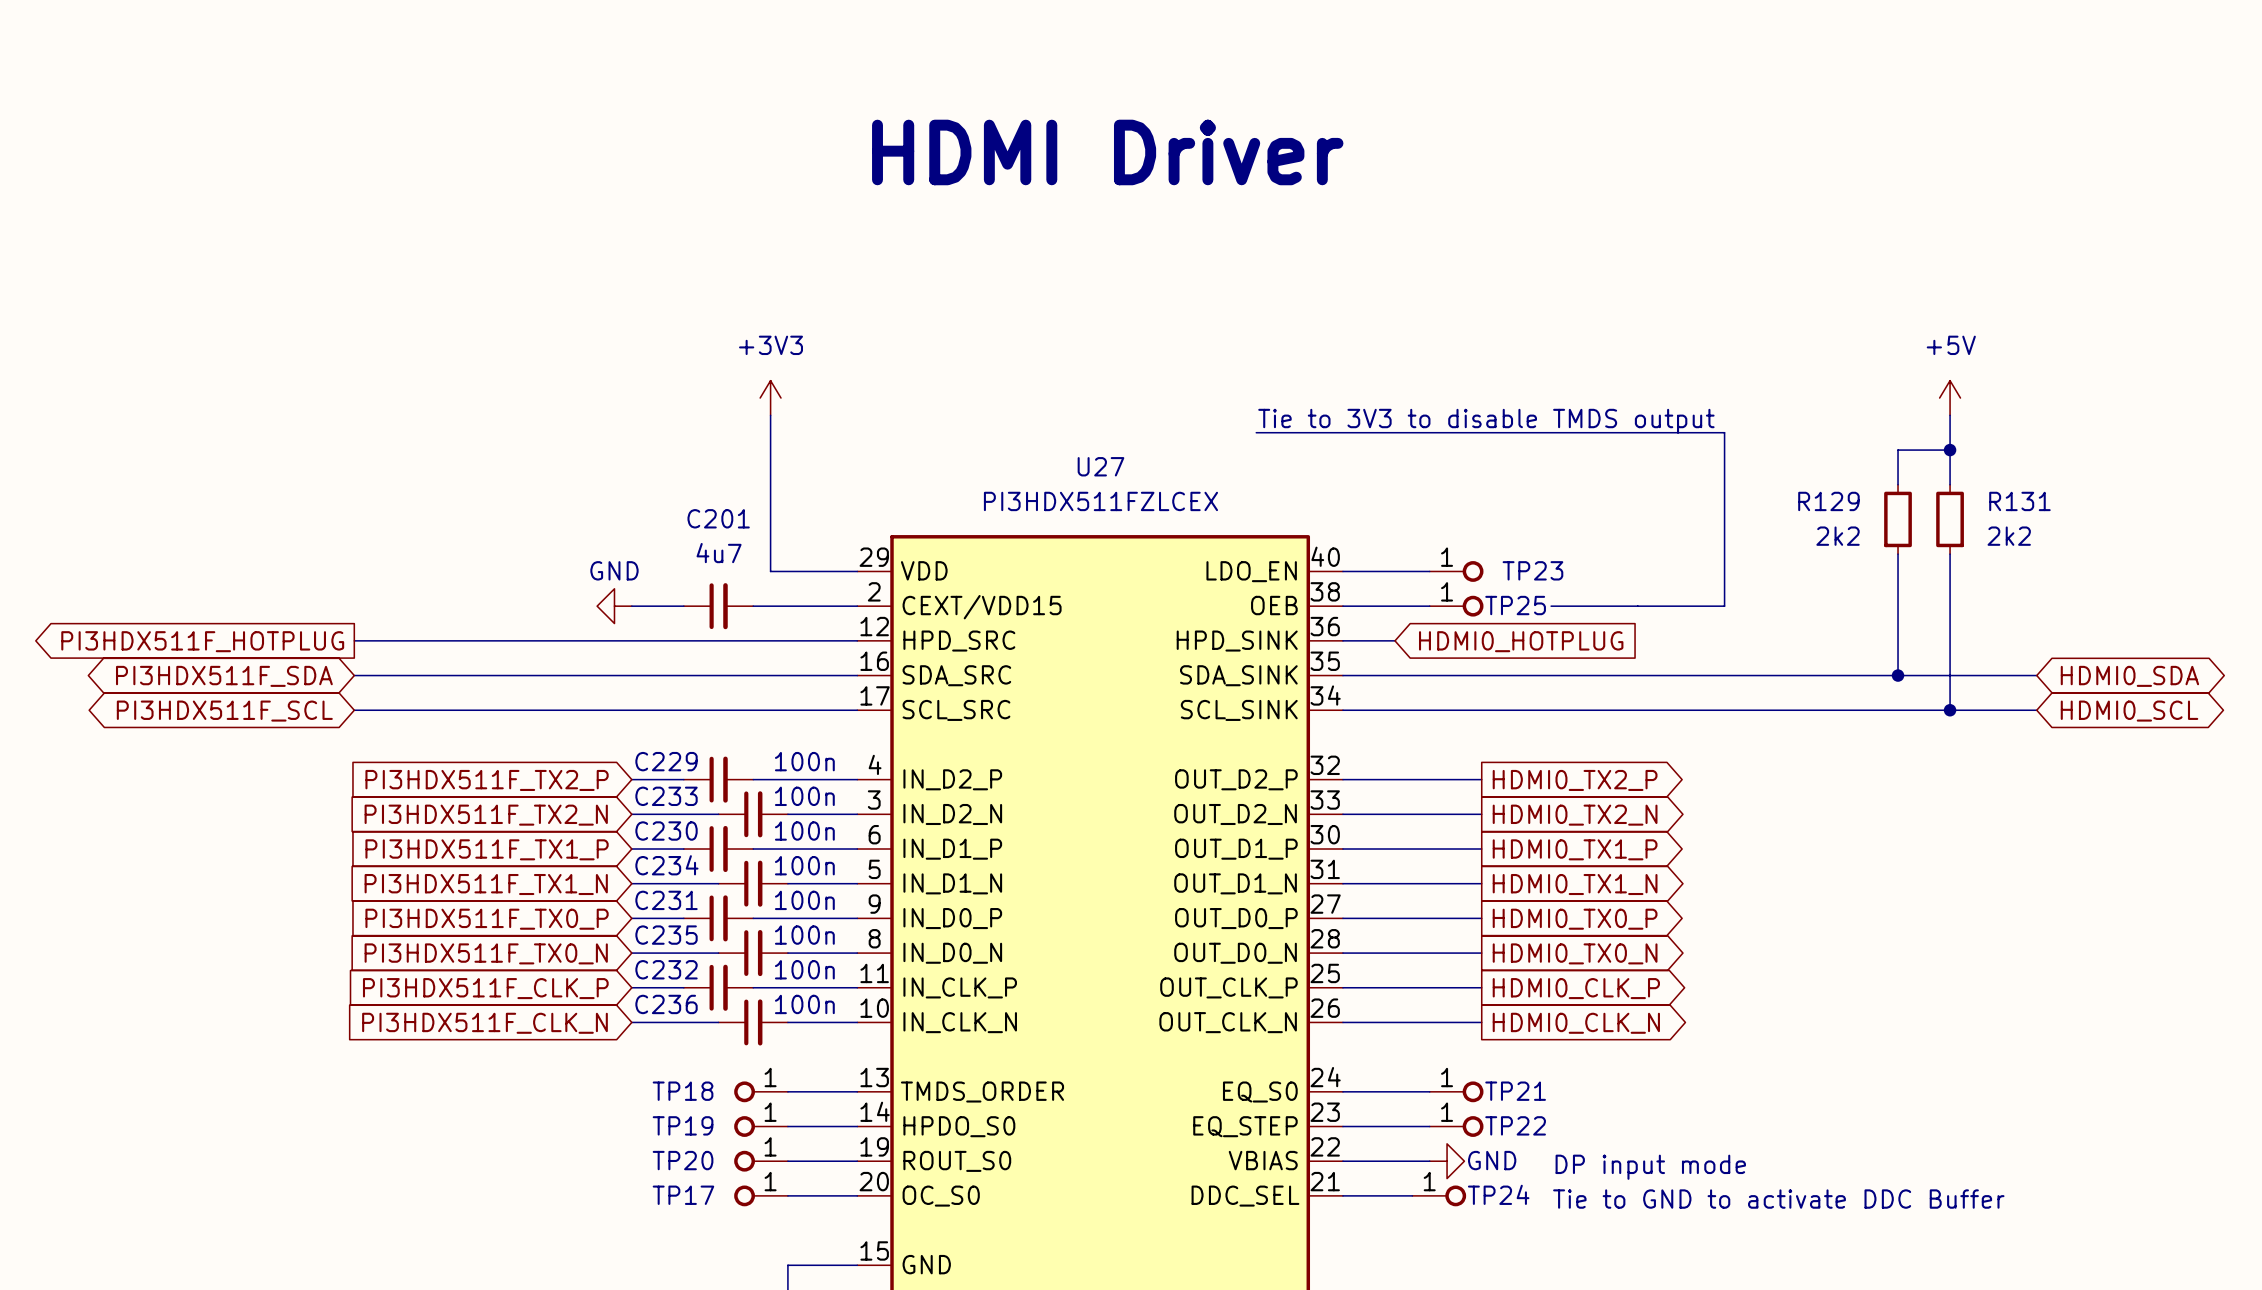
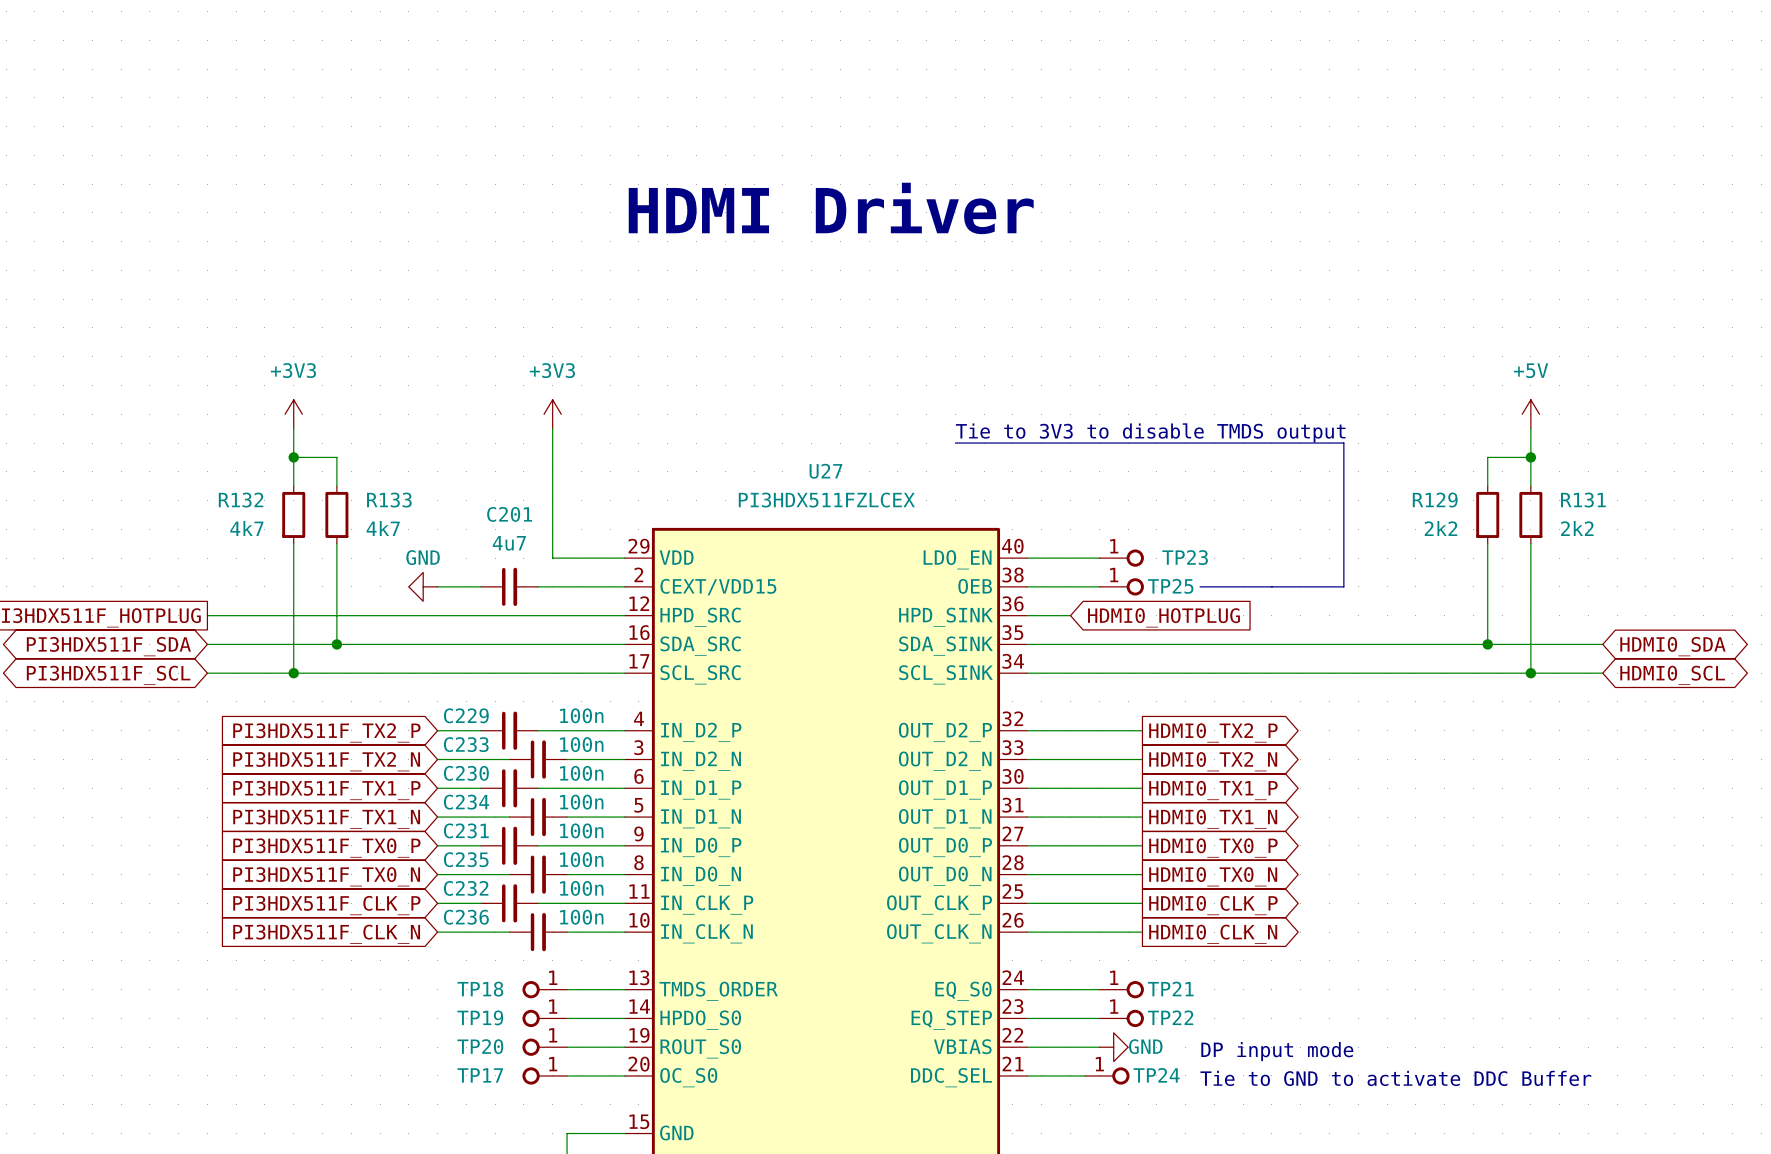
power symbol: none -> +3V3 (293, 414)
wire: none -> (293, 428) (293, 486)
wire: none -> (293, 457) (336, 457) (336, 486)
junction: none -> (293, 457)
R132: none -> (293, 514)
R133: none -> (336, 514)
wire: none -> (293, 543) (293, 673)
wire: none -> (336, 543) (336, 644)
junction: none -> (336, 644)
junction: none -> (293, 673)

